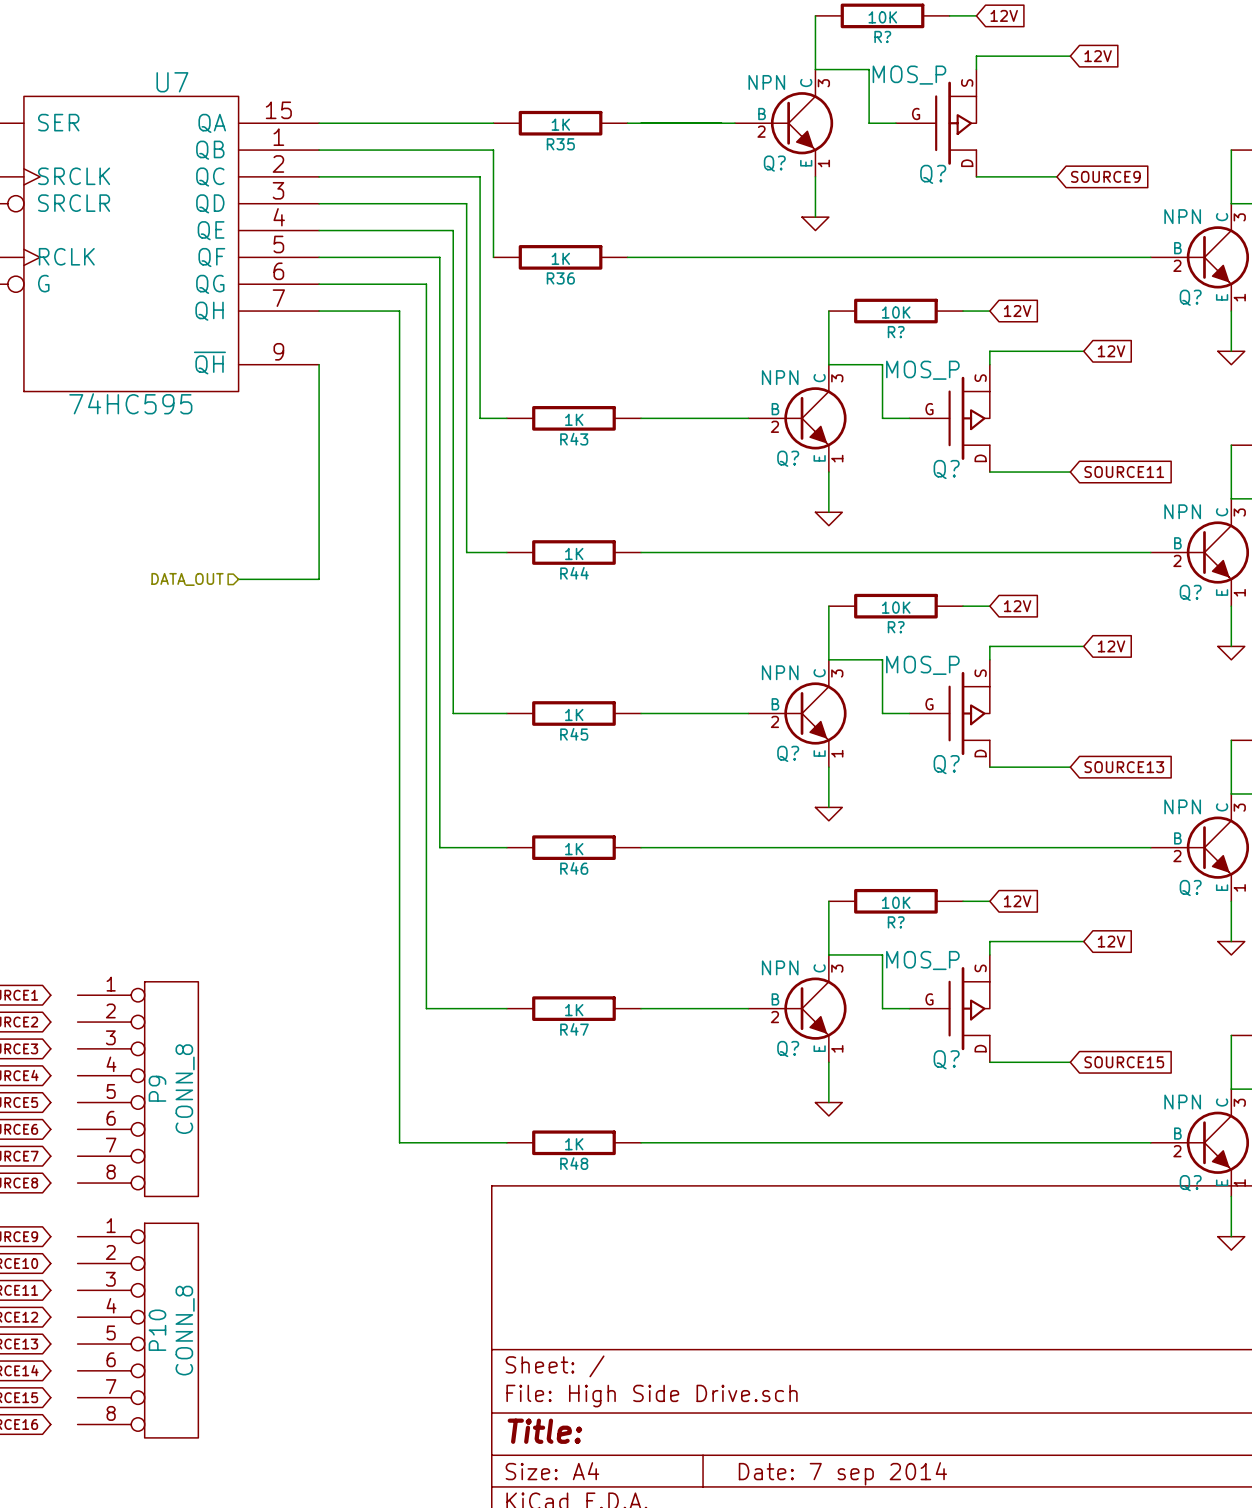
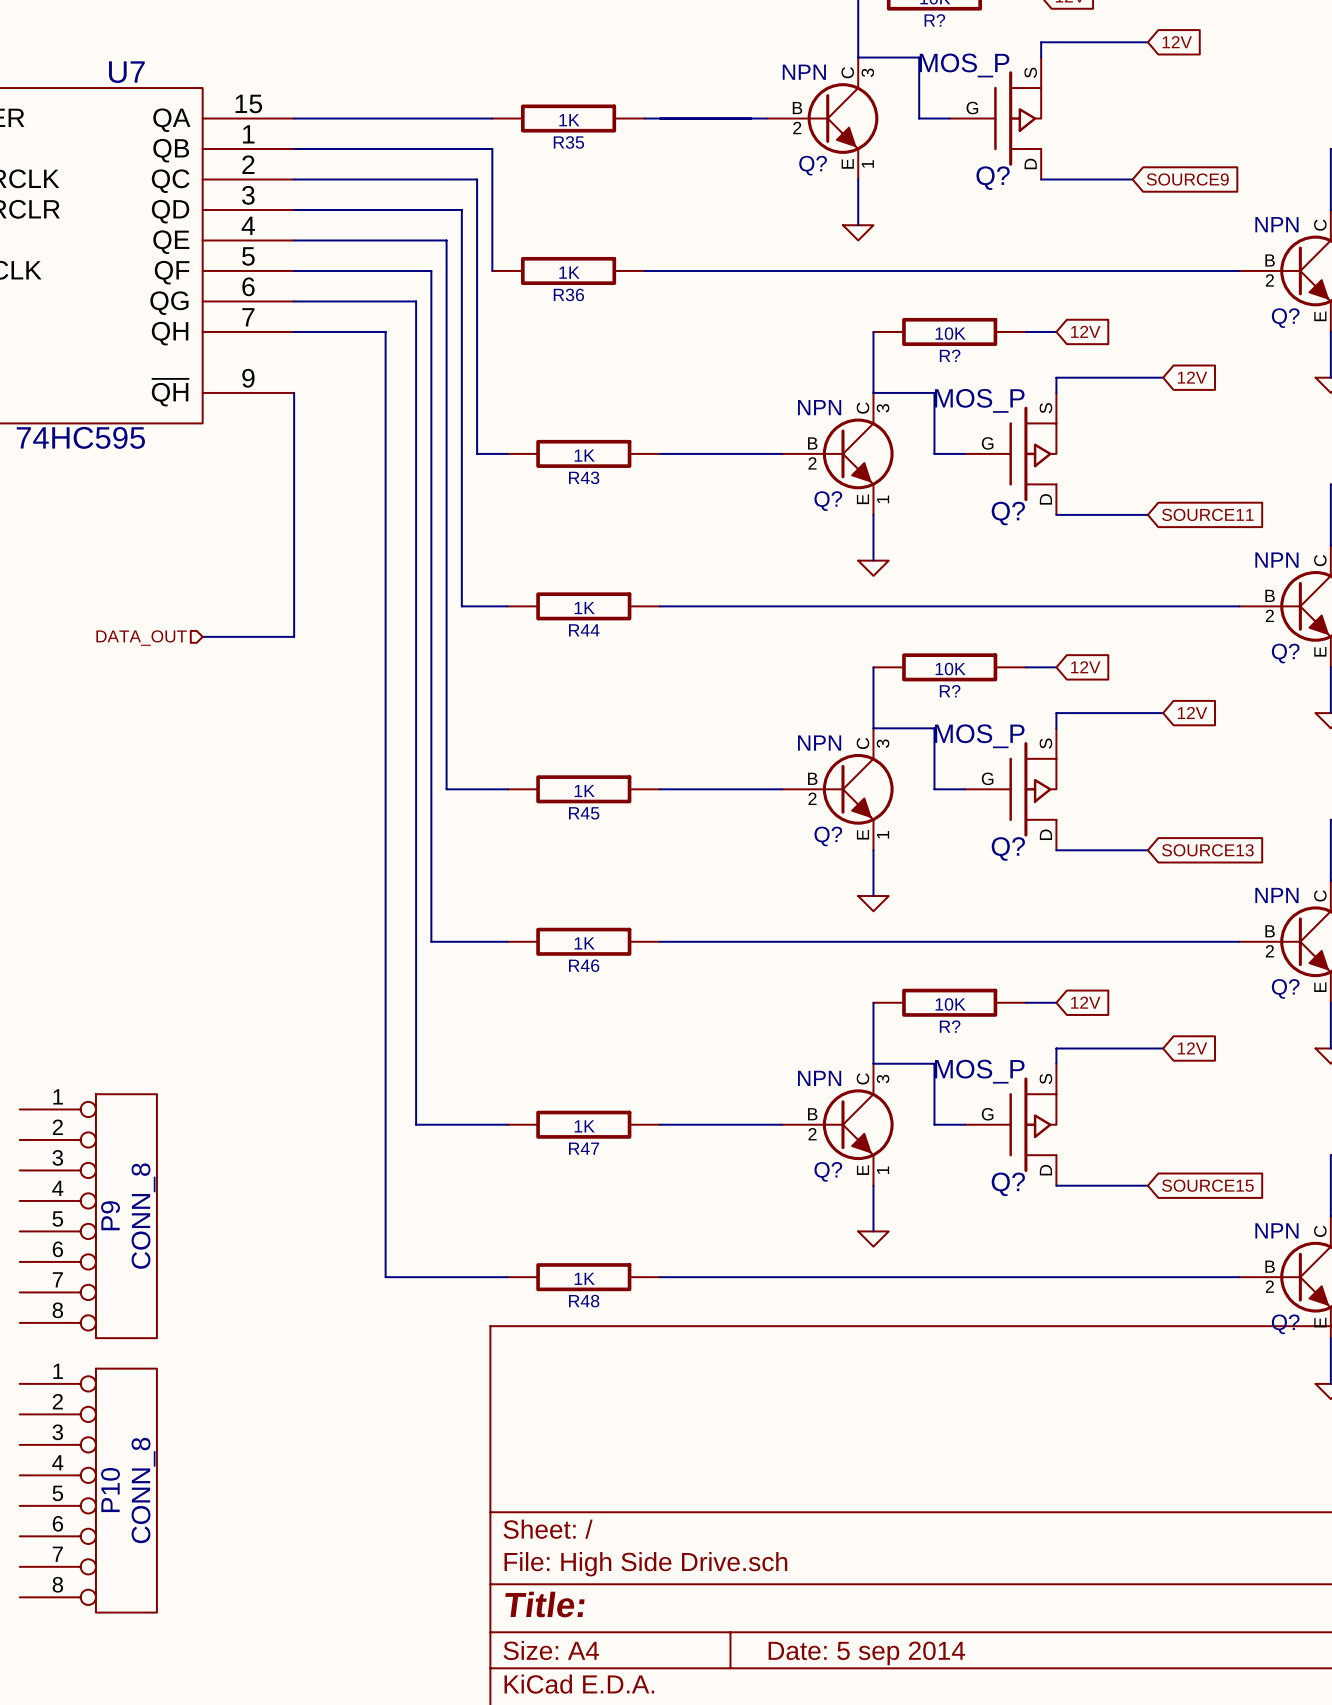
title block: Date: 7 sep 2014 (842, 1473) -> Date: 5 sep 2014 (866, 1653)

